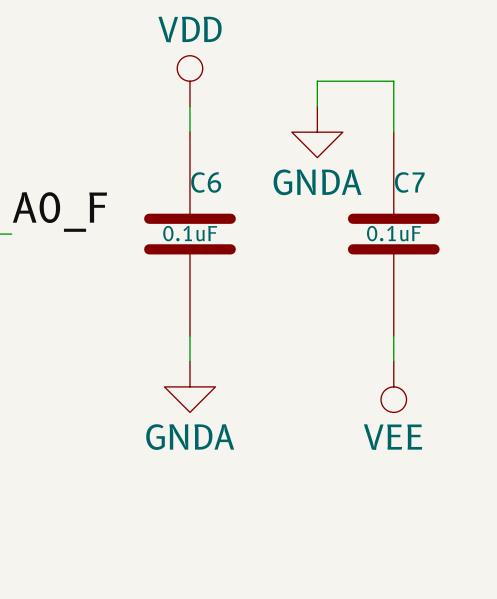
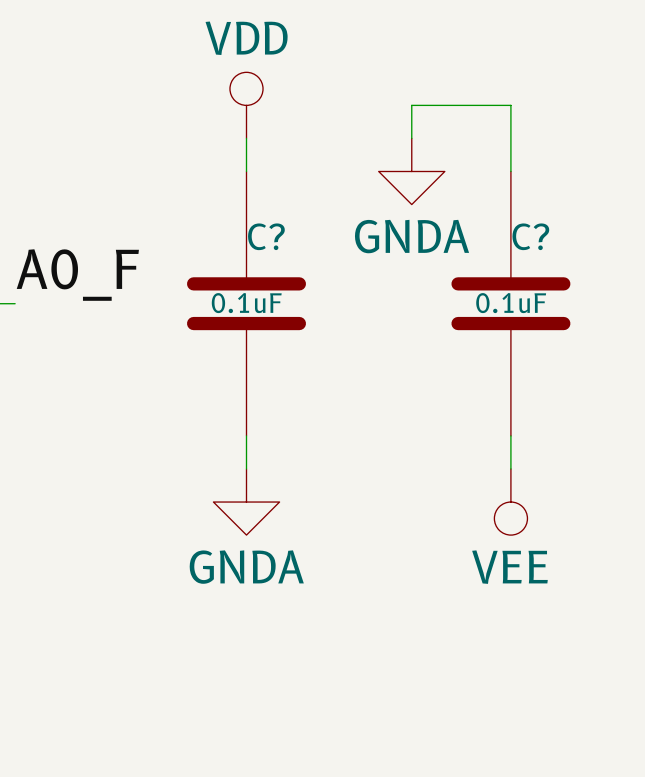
C6 name: C6 (206, 182) -> C? (266, 236)
C7 name: C7 (409, 182) -> C? (530, 236)

